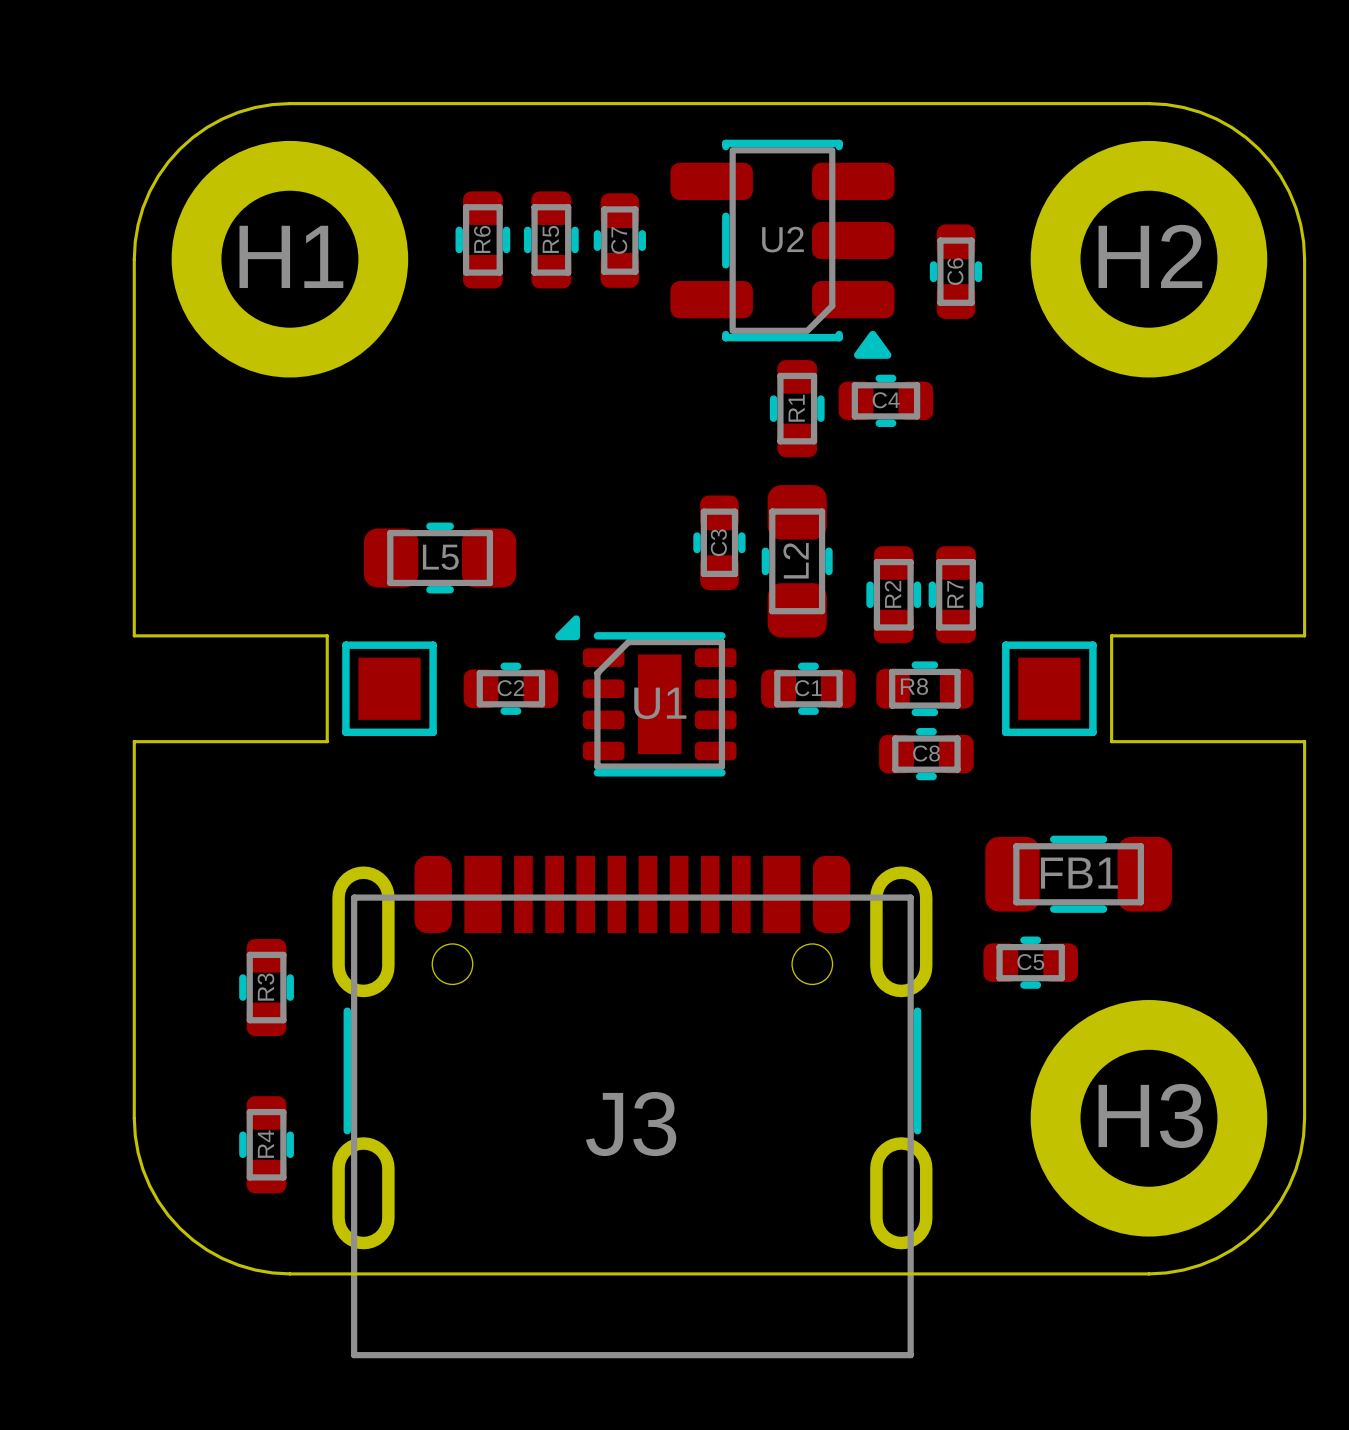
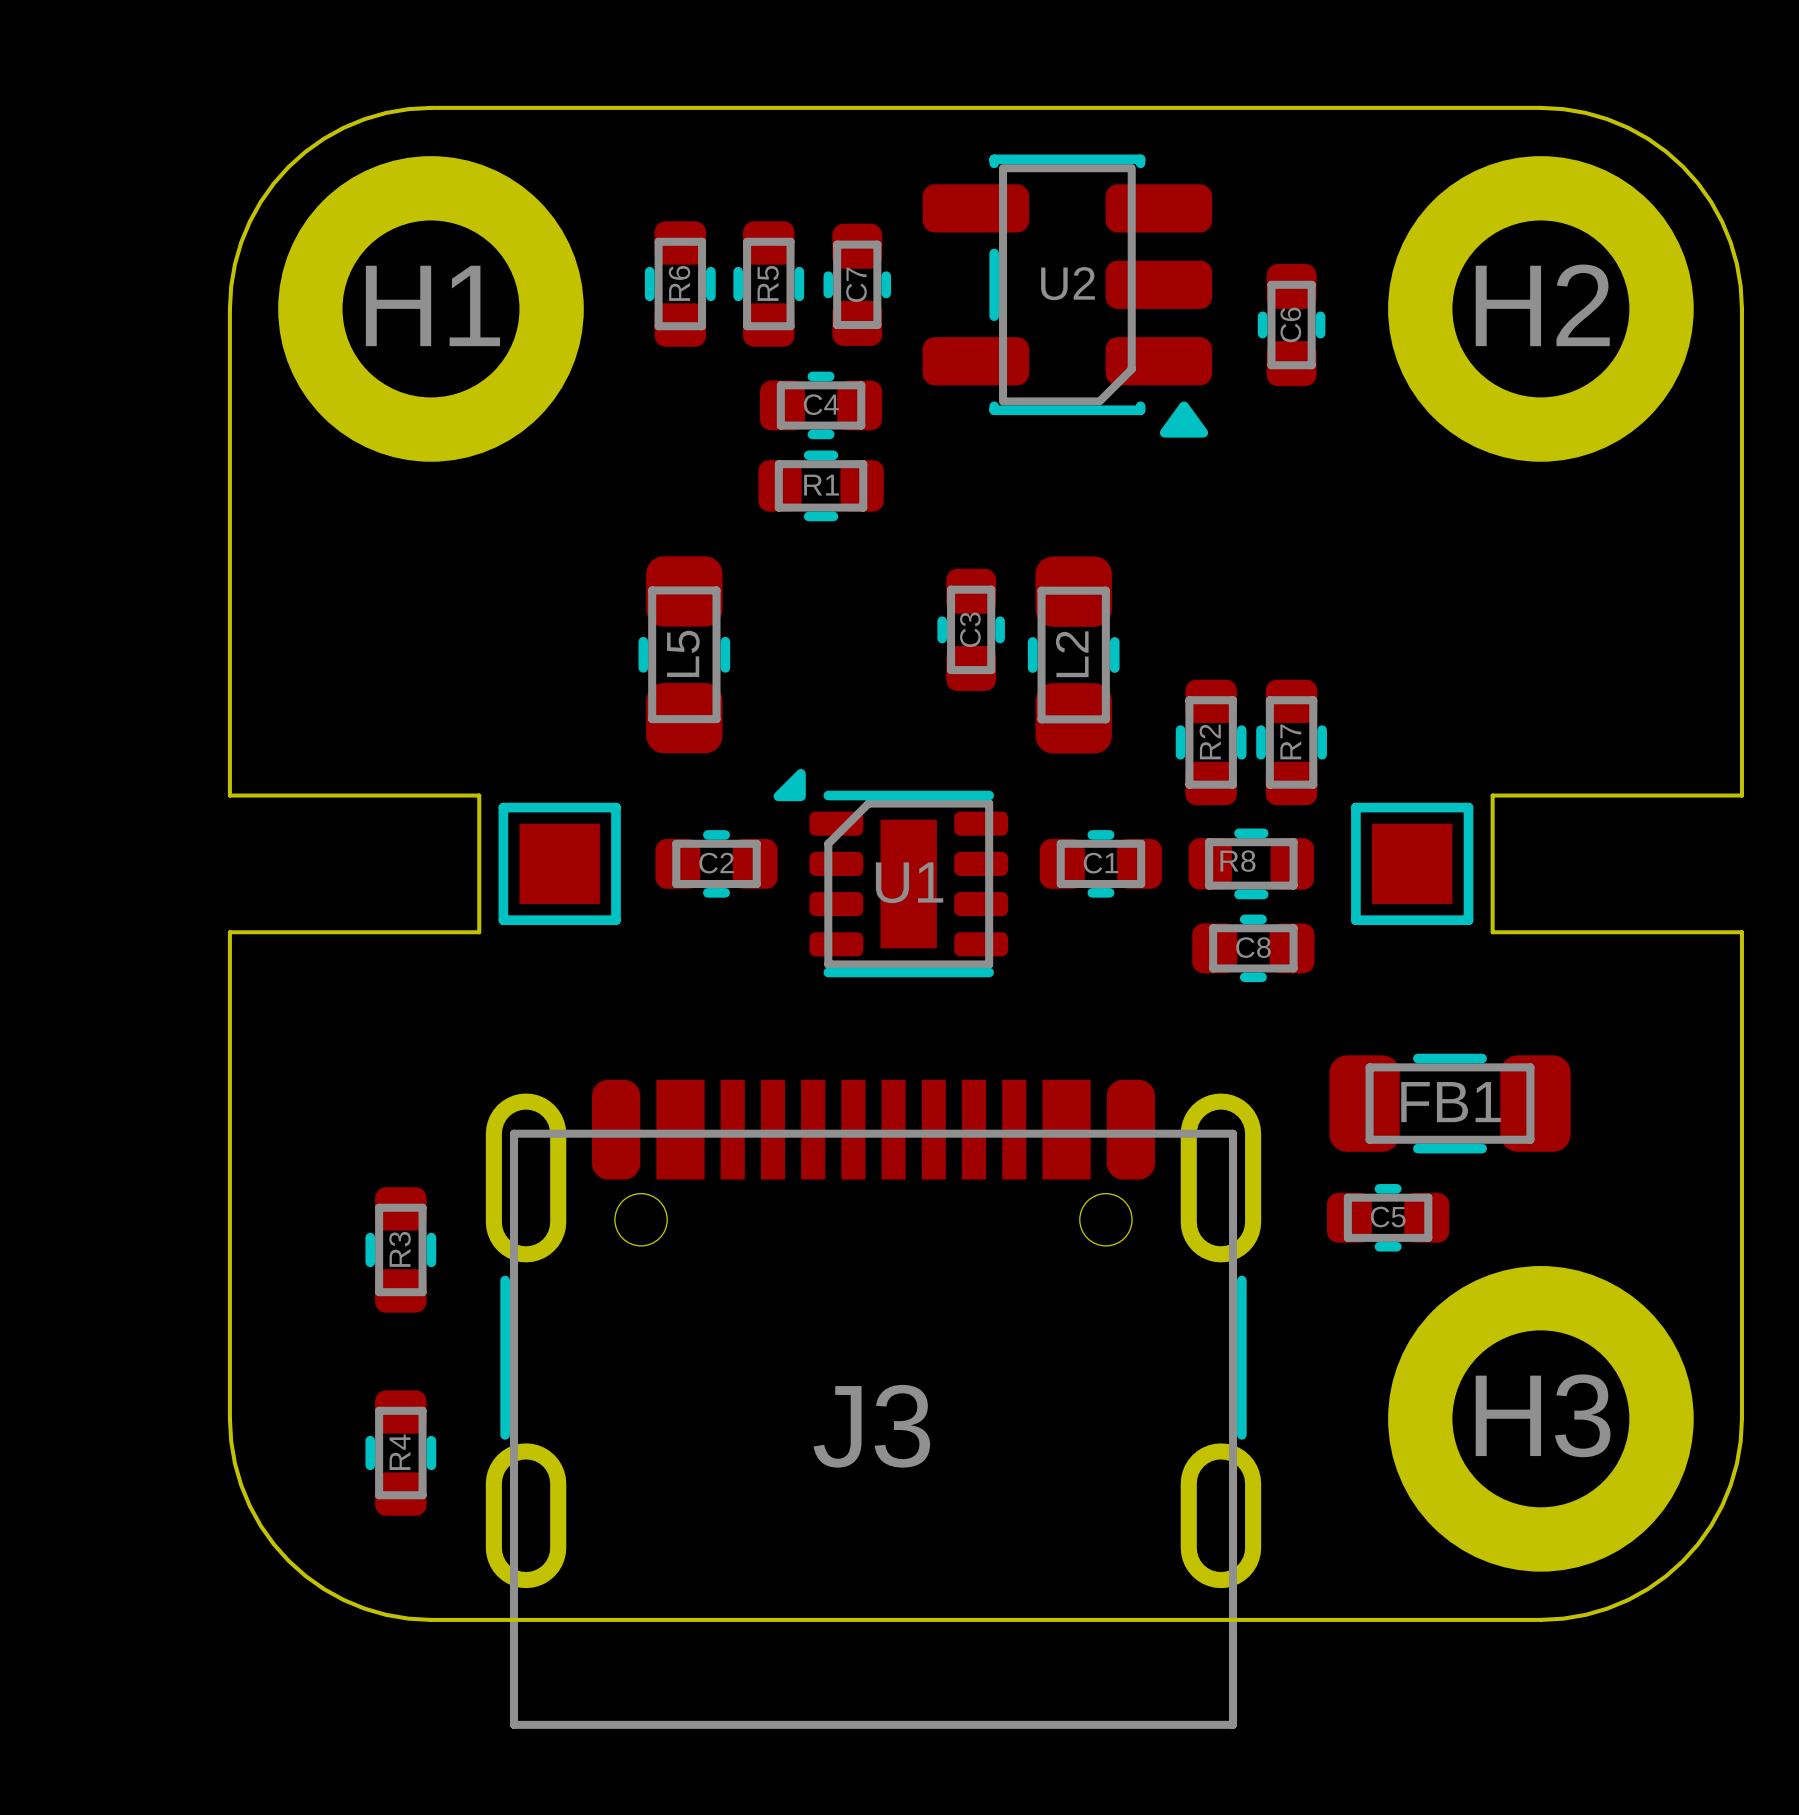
C4 position: (885, 400) -> (821, 405)
R1 rotation: 0° (797, 408) -> 90° clockwise (821, 485)
R1 position: (797, 408) -> (821, 485)
C3 position: (719, 542) -> (971, 629)
L5 rotation: 0° (440, 558) -> 90° clockwise (684, 654)
L2 position: (797, 561) -> (1073, 655)

